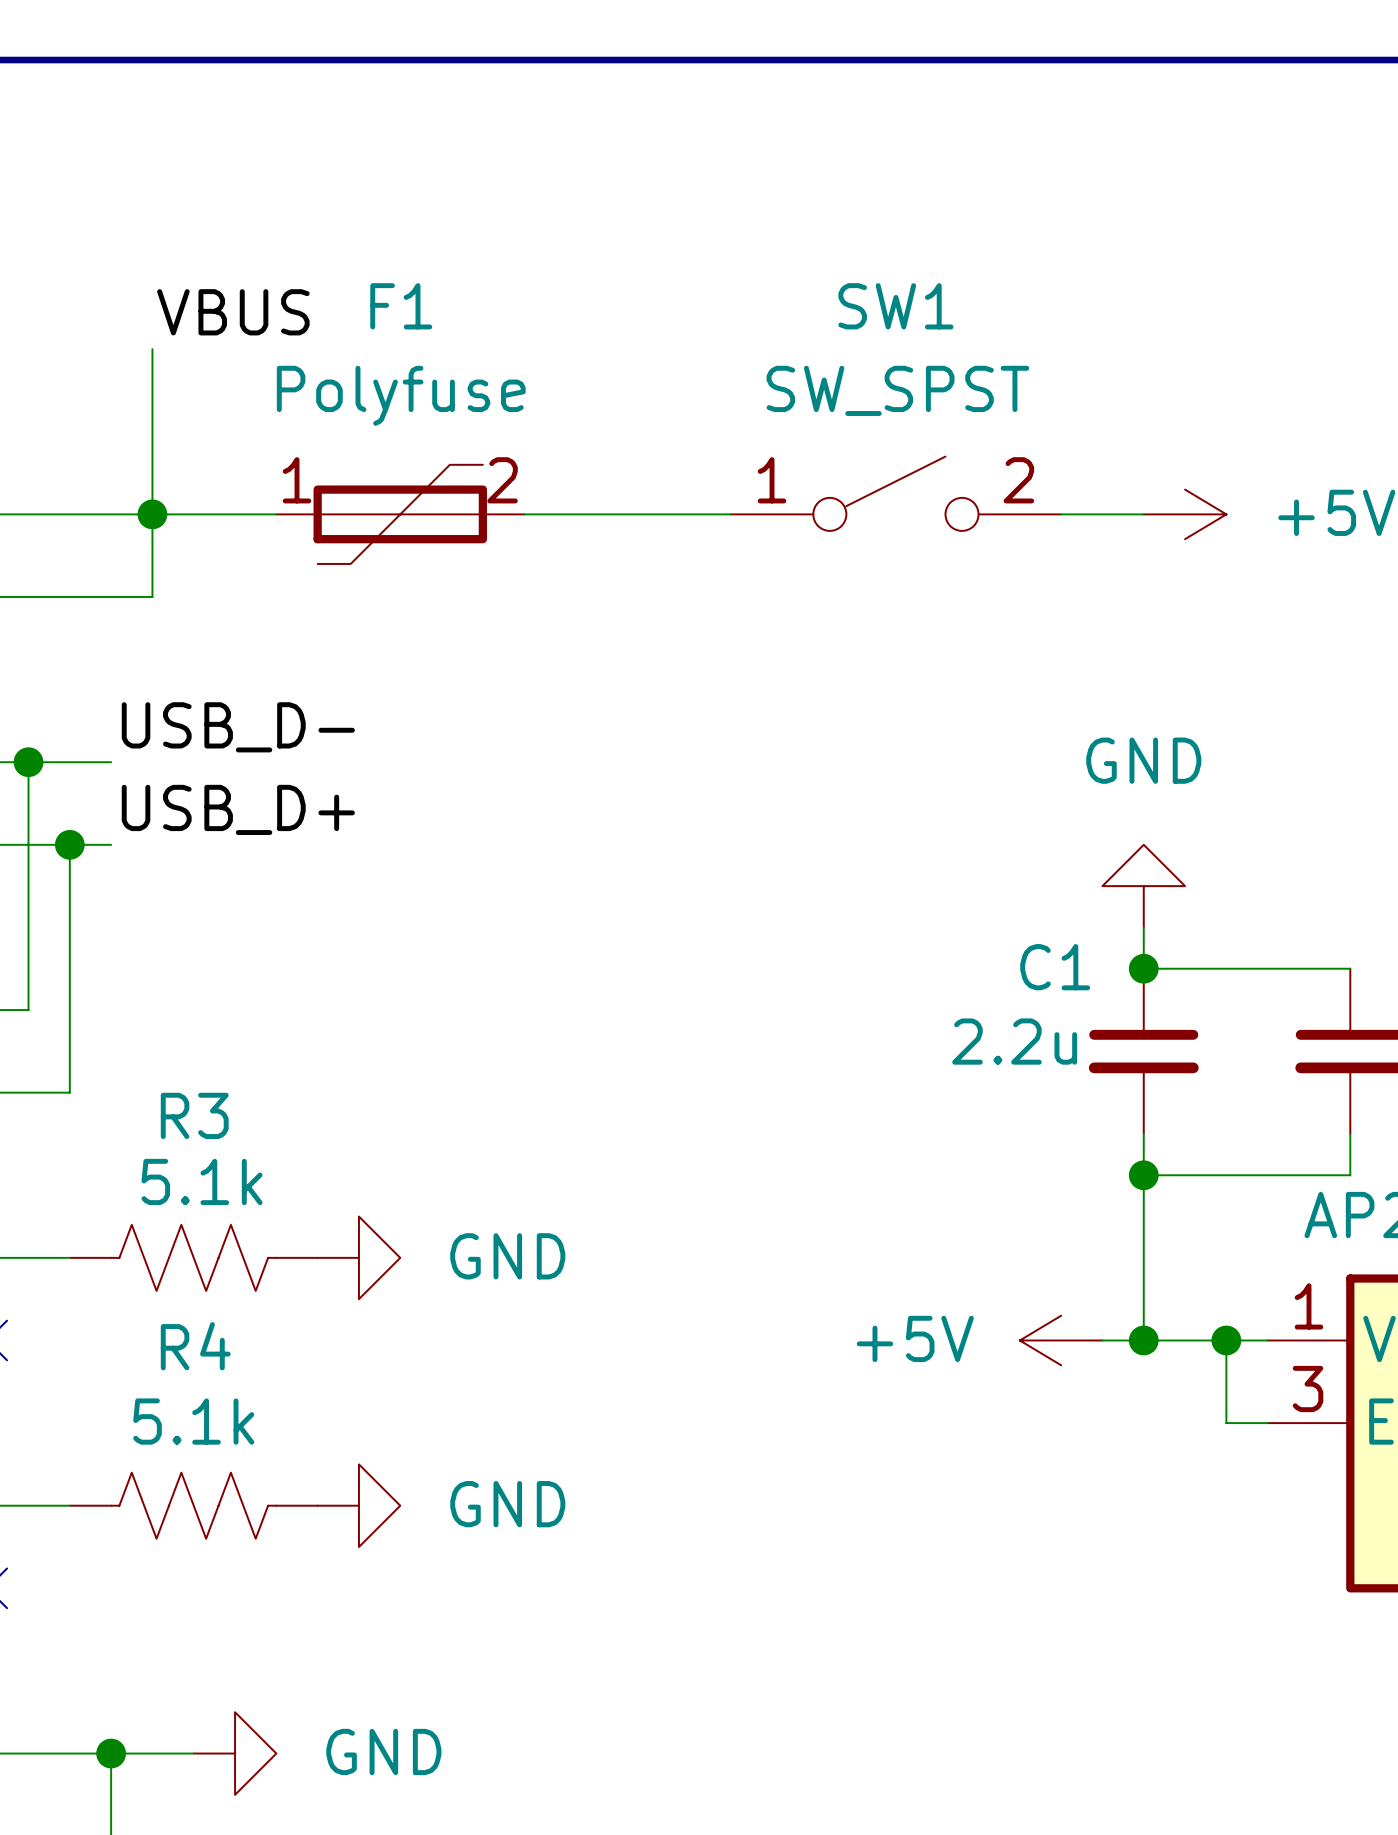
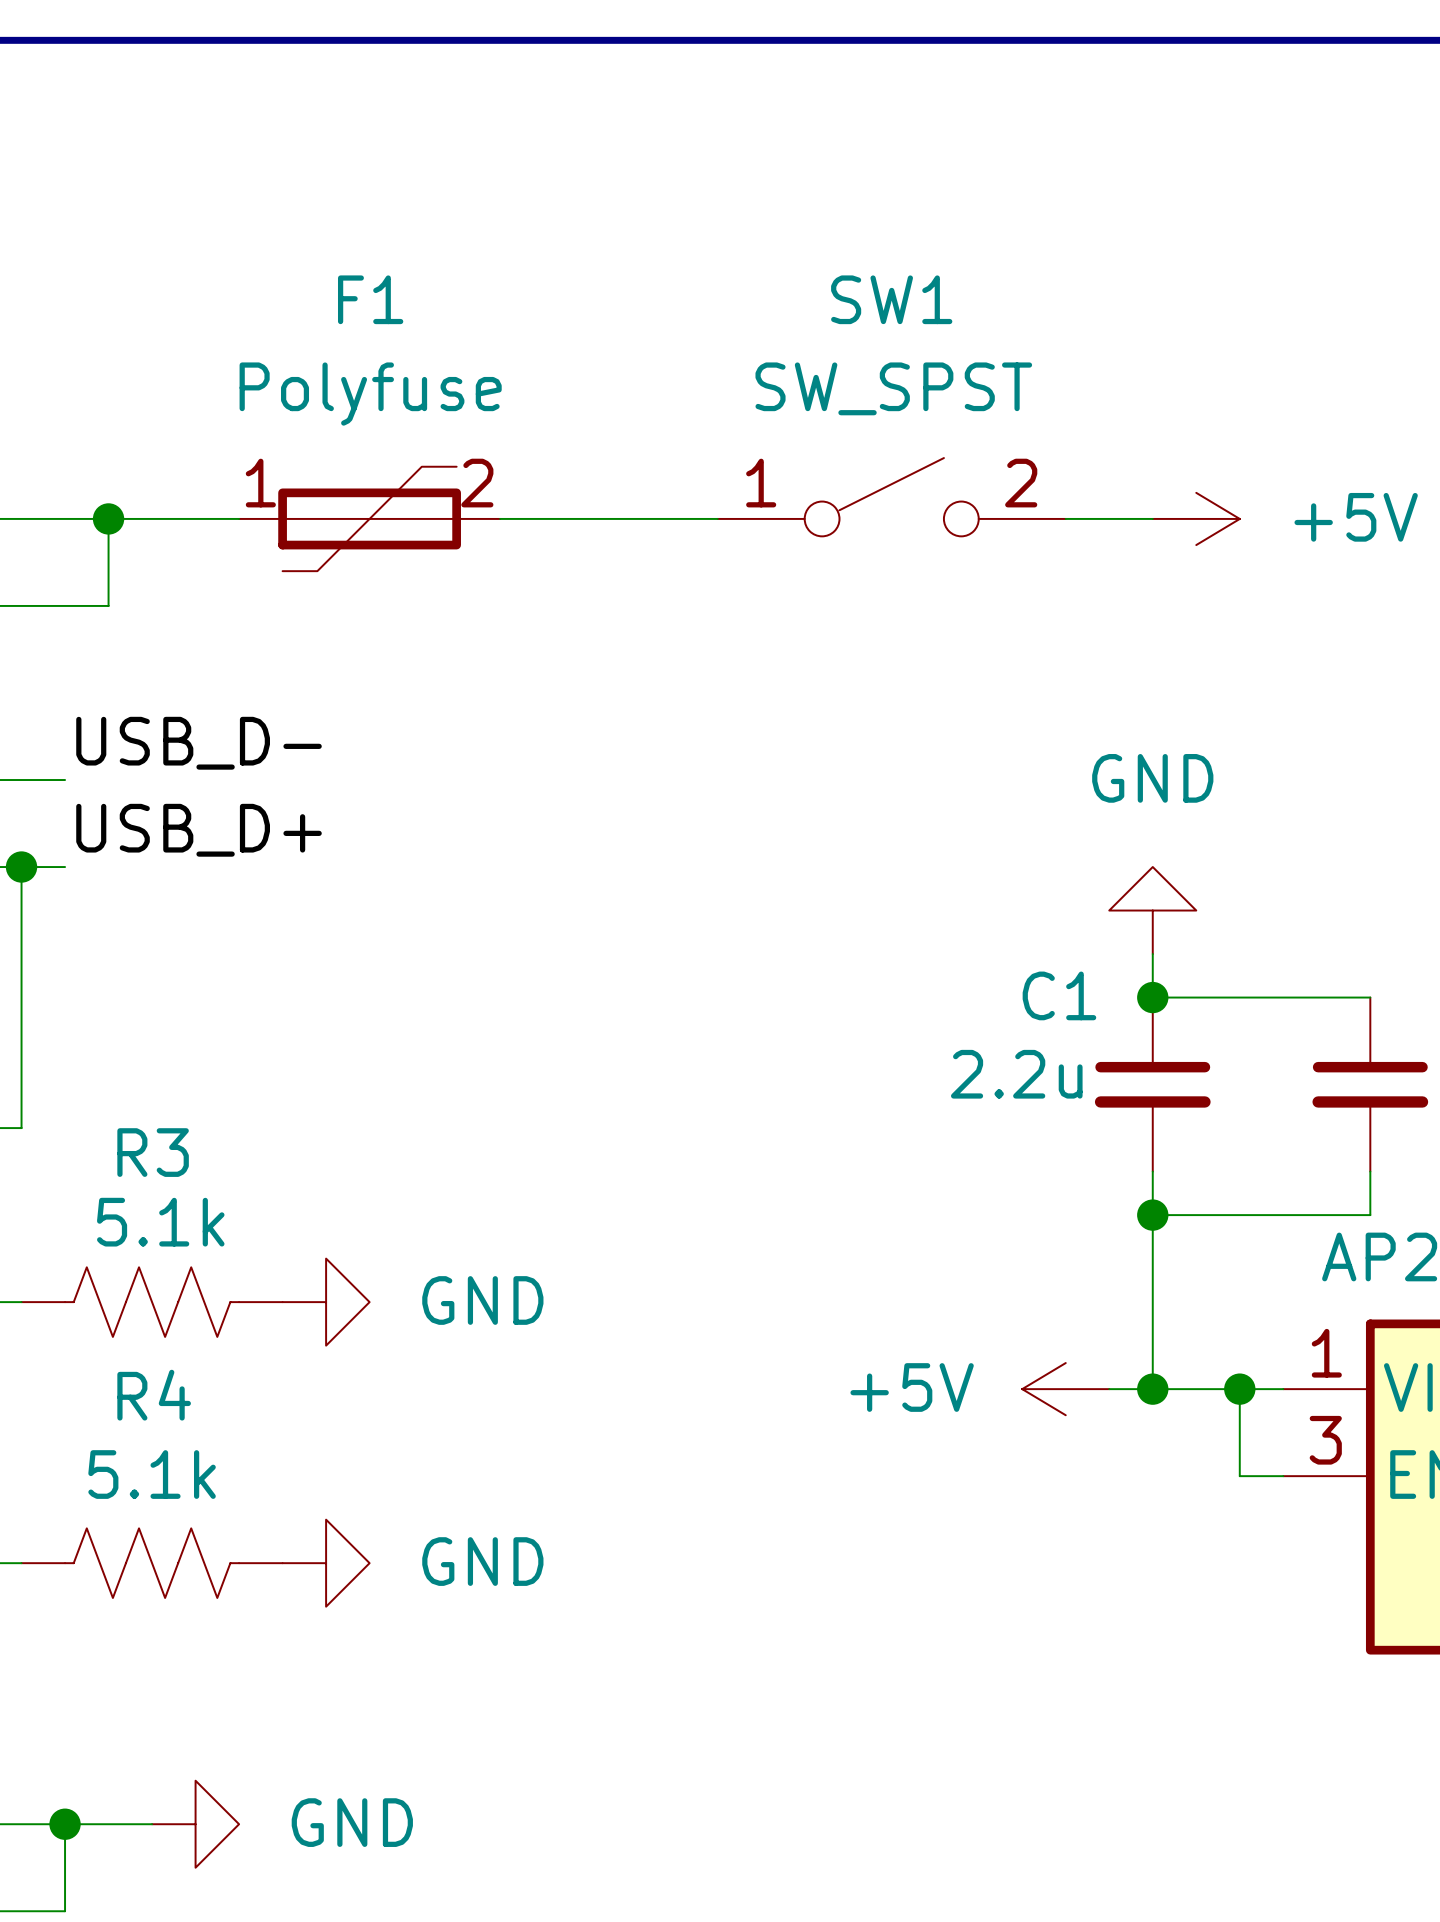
label: VBUS (233, 312) -> none
wire: (152, 349) (152, 514) -> none

